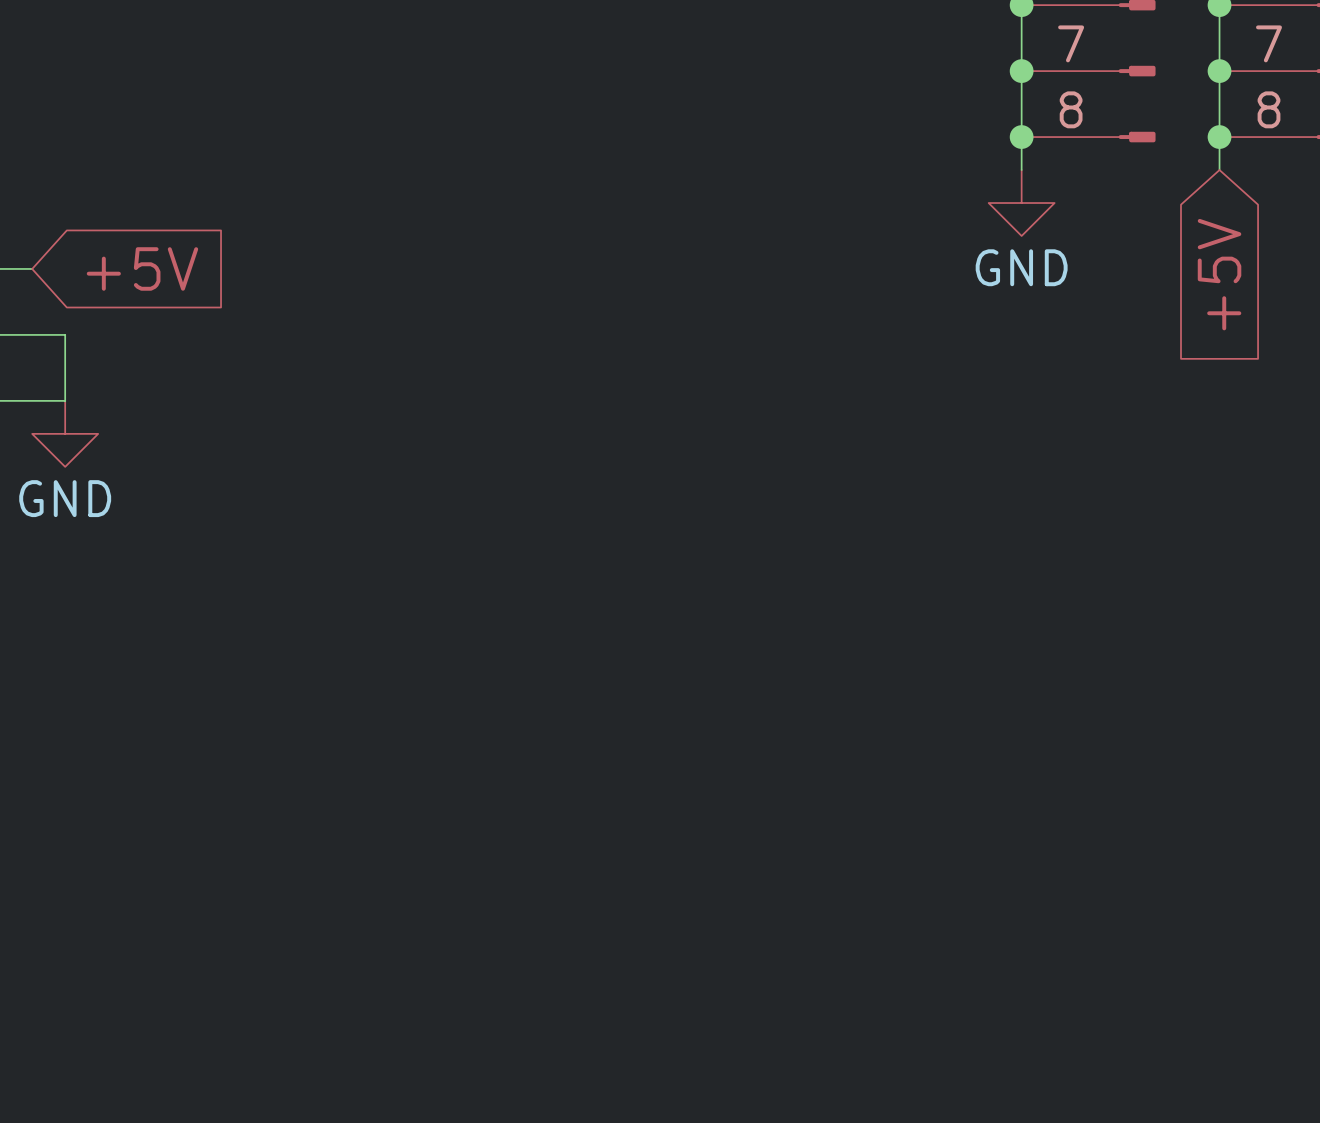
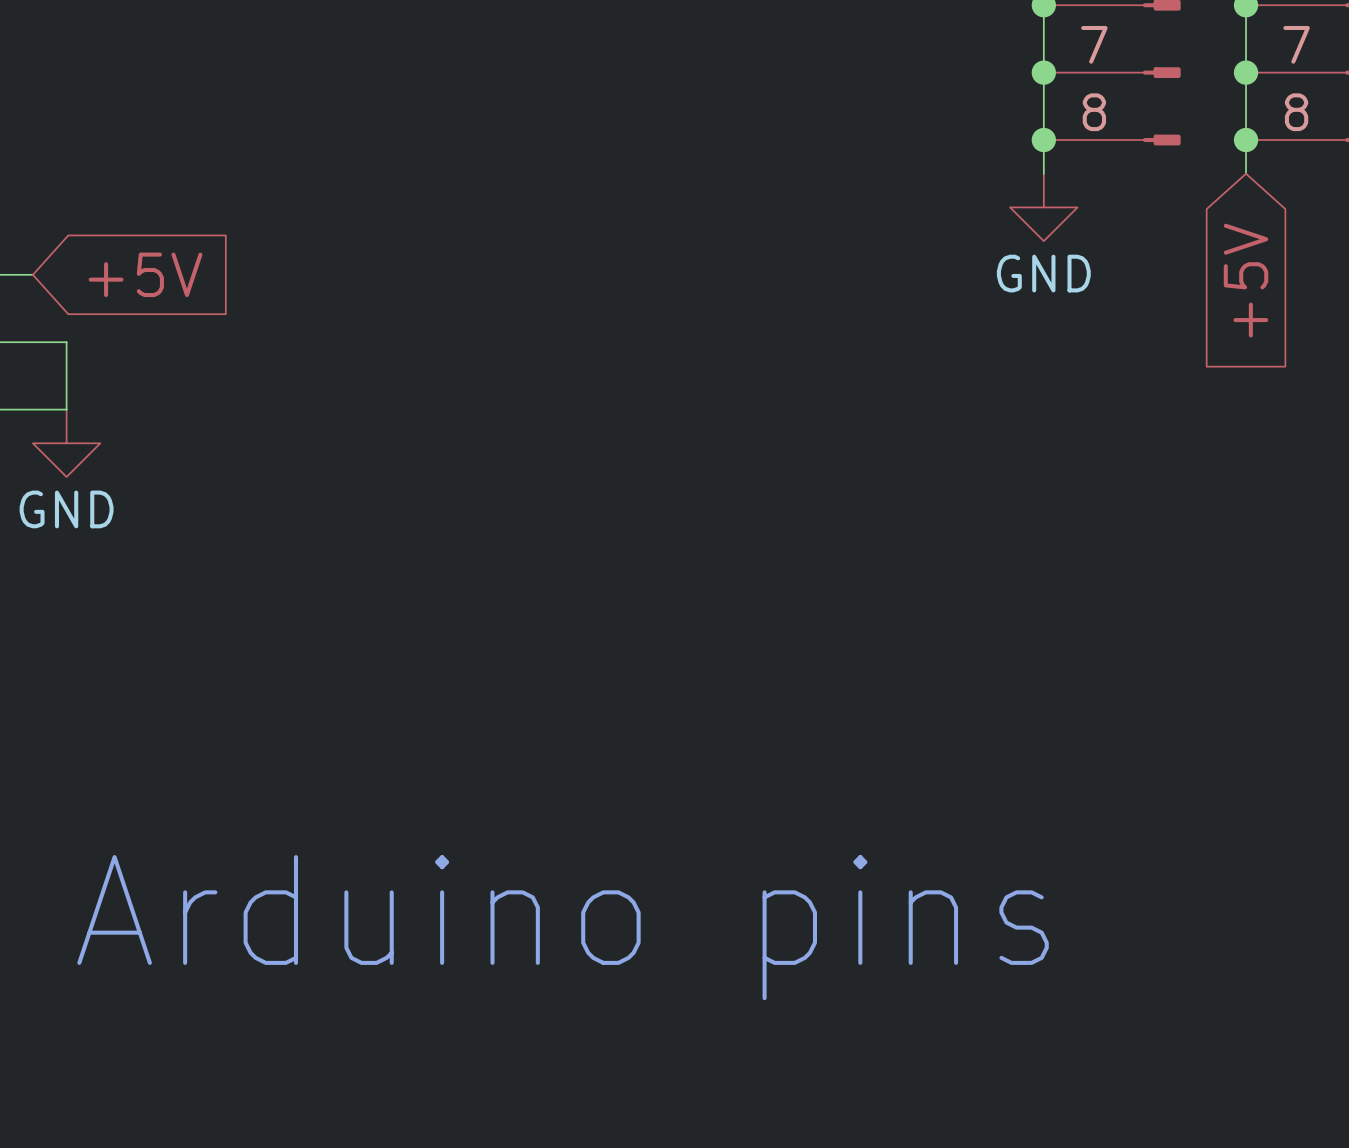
text: none -> Arduino pins (563, 927)

